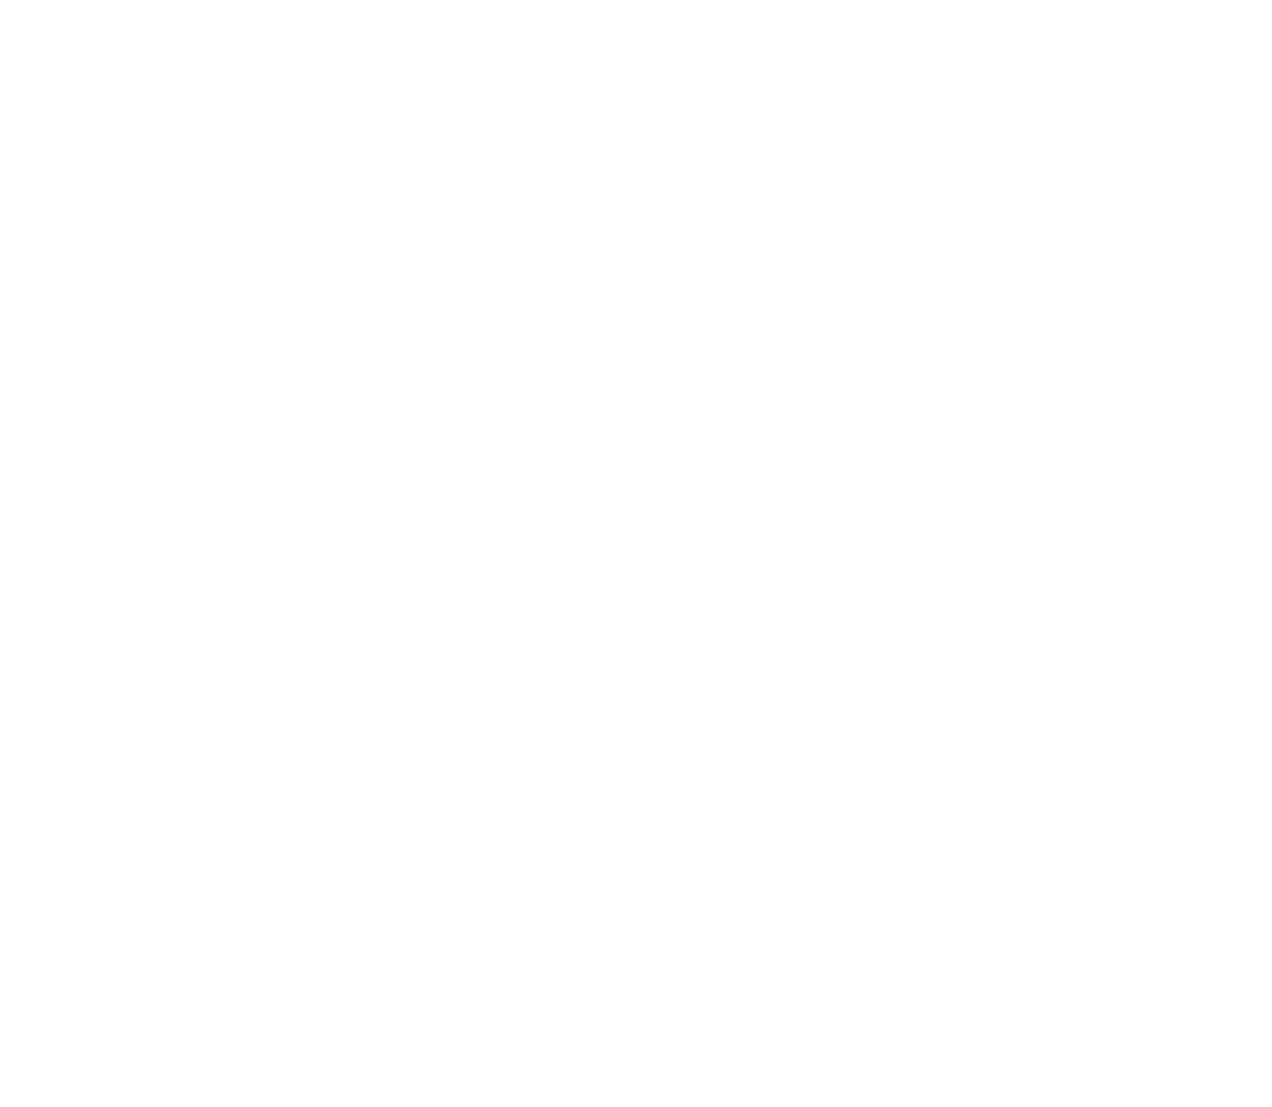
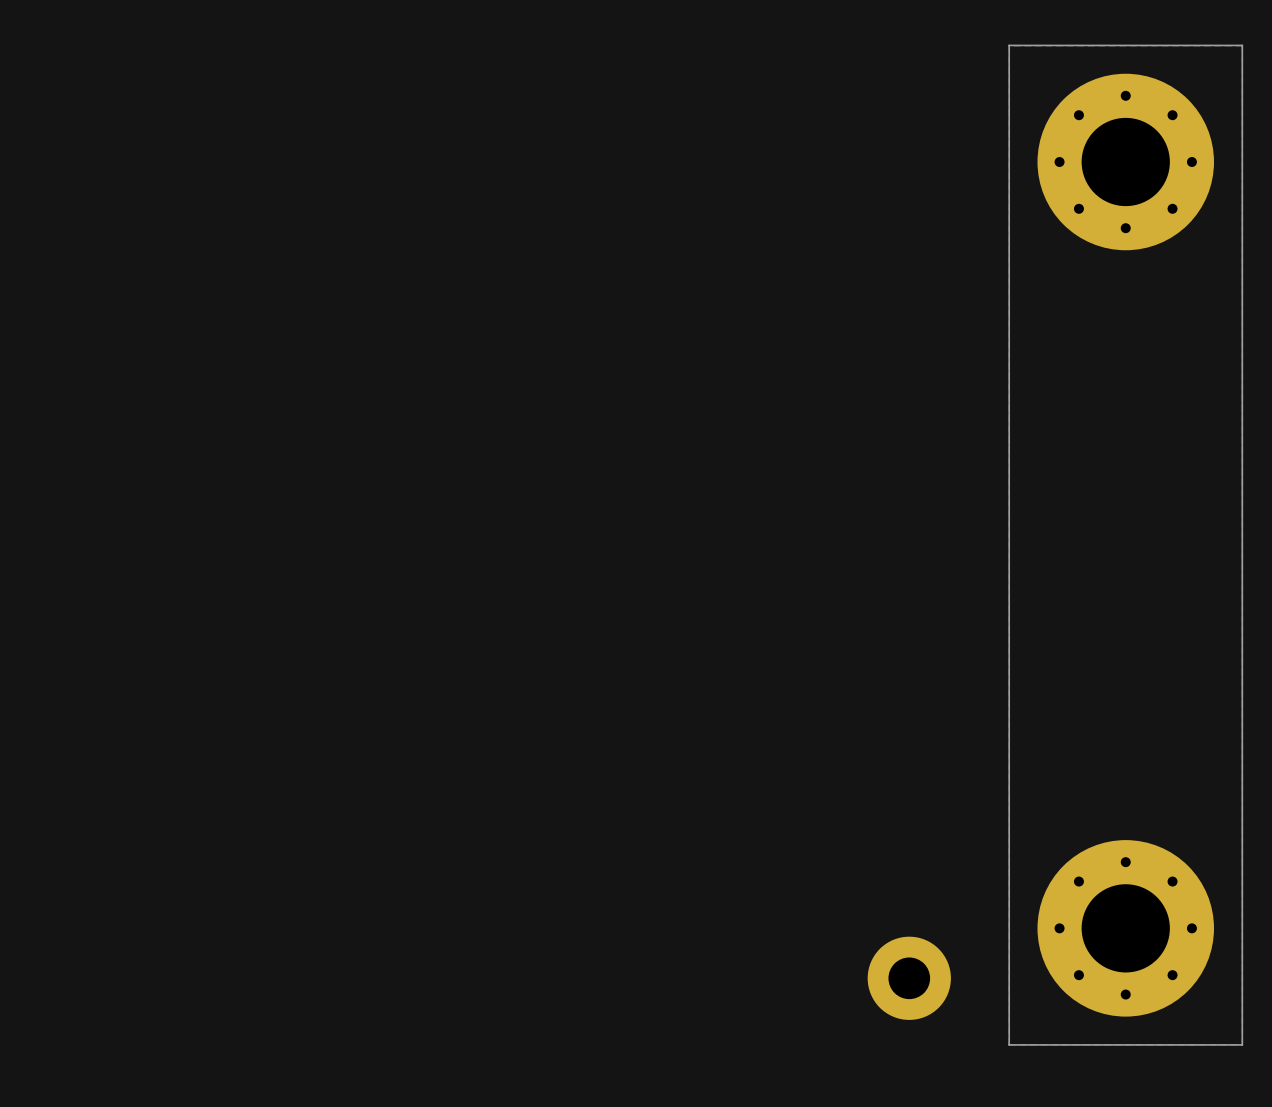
board edge: none -> (1242, 45) (1009, 45) (1009, 1044) (1242, 1044) (1242, 45)
part: none -> (1125, 162)
part: none -> (1125, 928)
part: none -> (909, 978)

